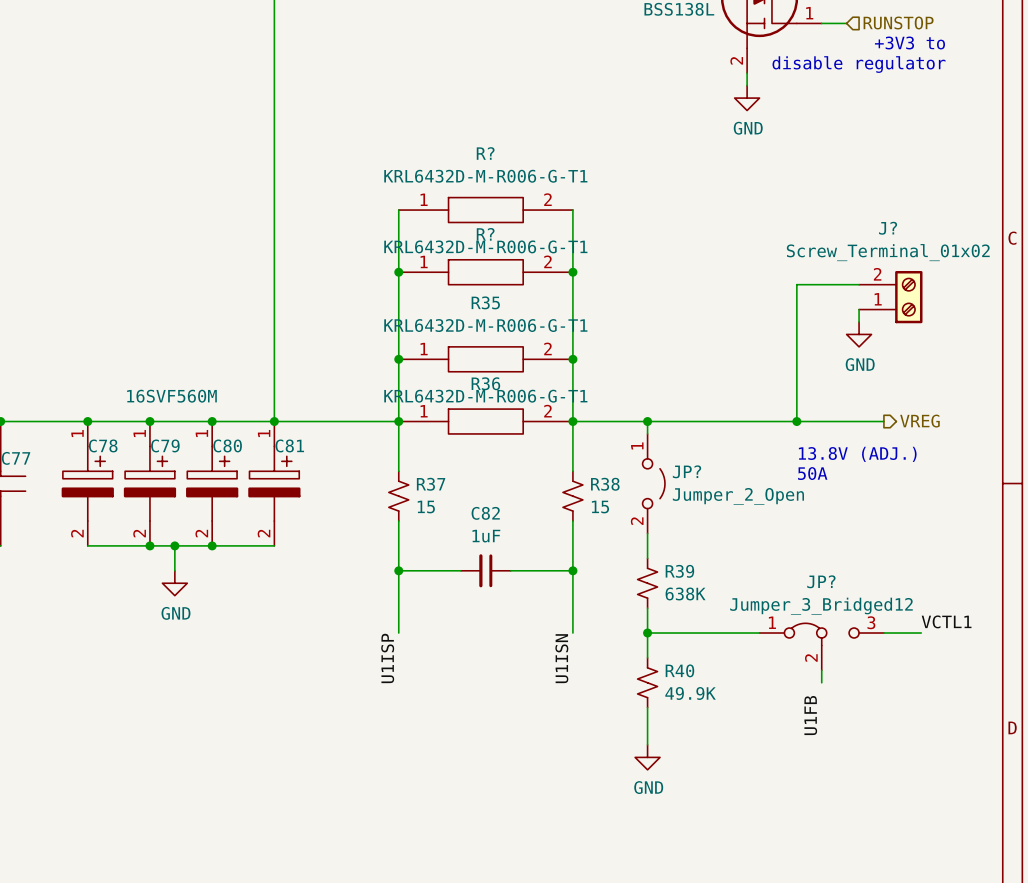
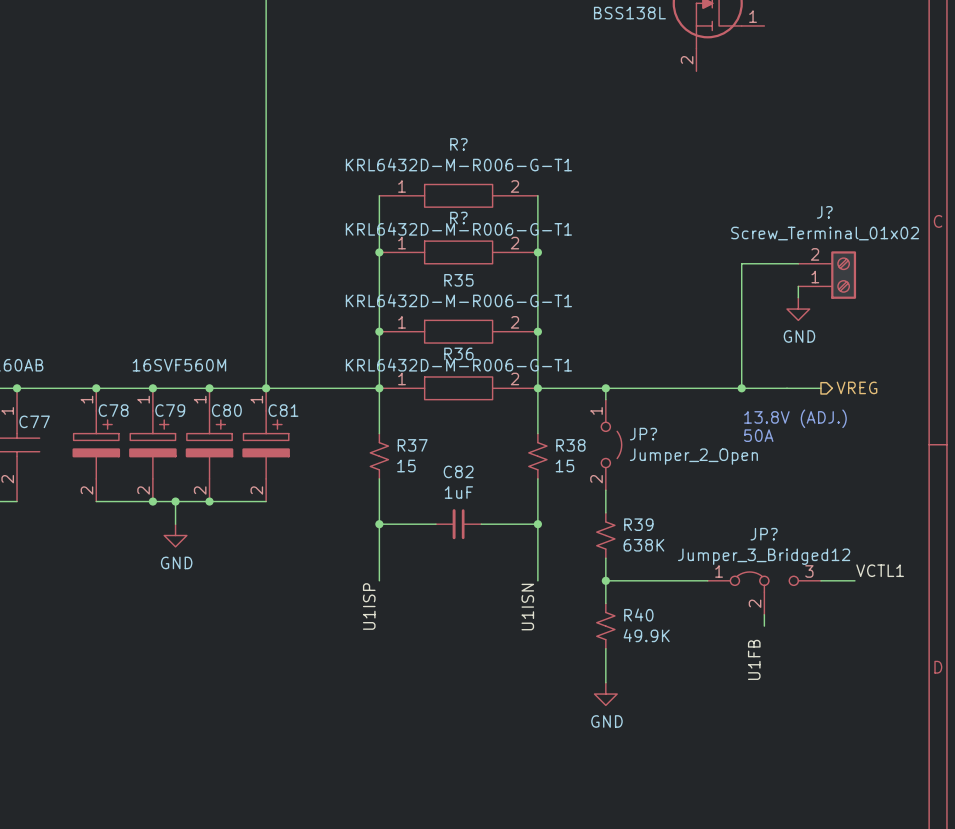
hierarchical label: RUNSTOP (898, 22) -> none
wire: (821, 23) (846, 23) -> none
text: +3V3 to (909, 42) -> none
text: disable regulator (859, 64) -> none
wire: (747, 73) (747, 85) -> none
power symbol: GND (747, 98) -> none

